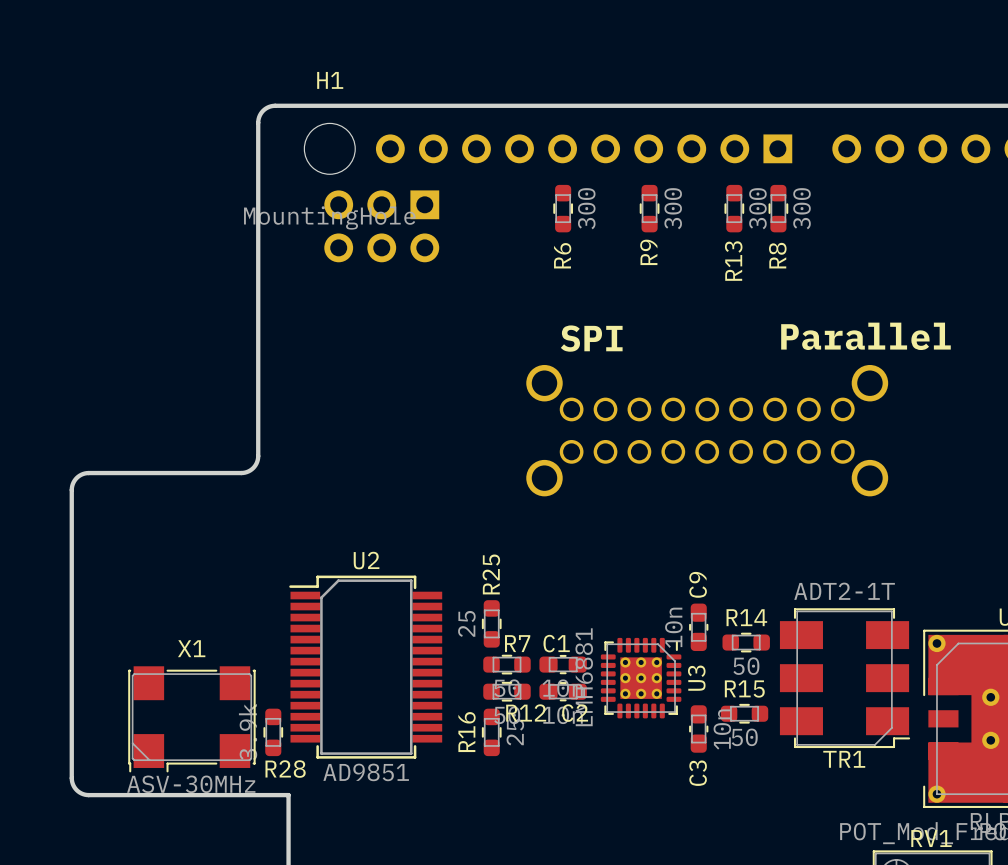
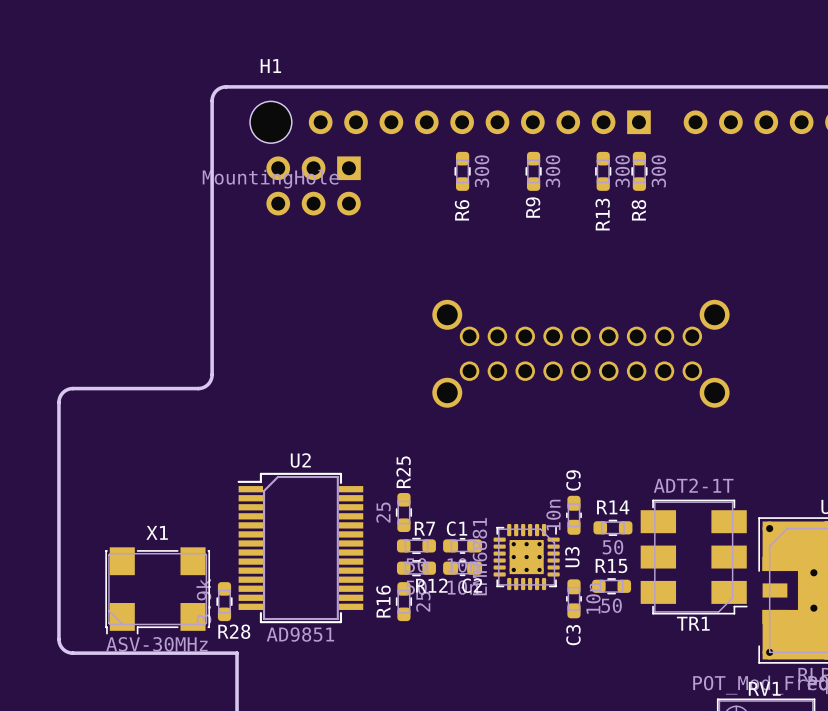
text: Parallel (865, 336) -> none
text: SPI (591, 338) -> none

